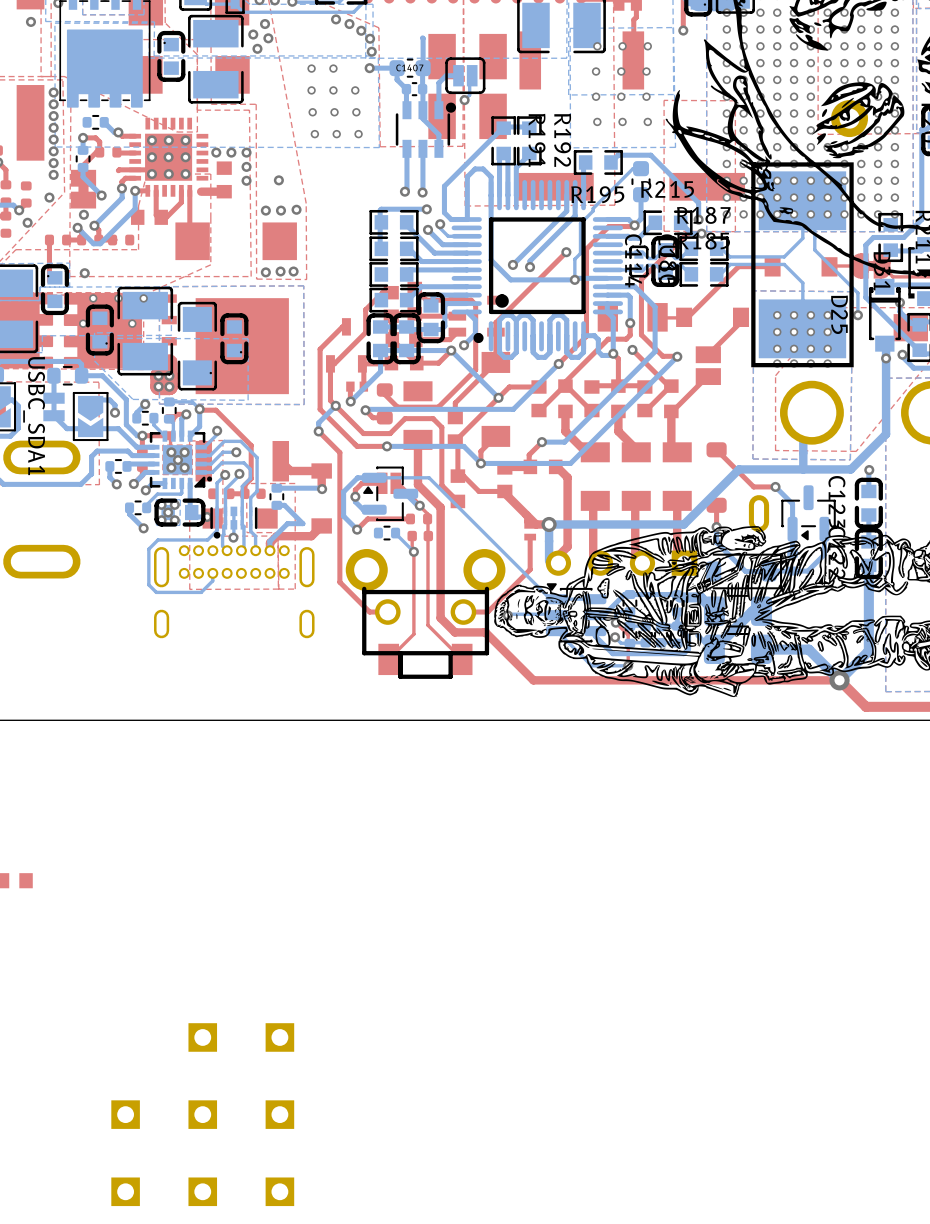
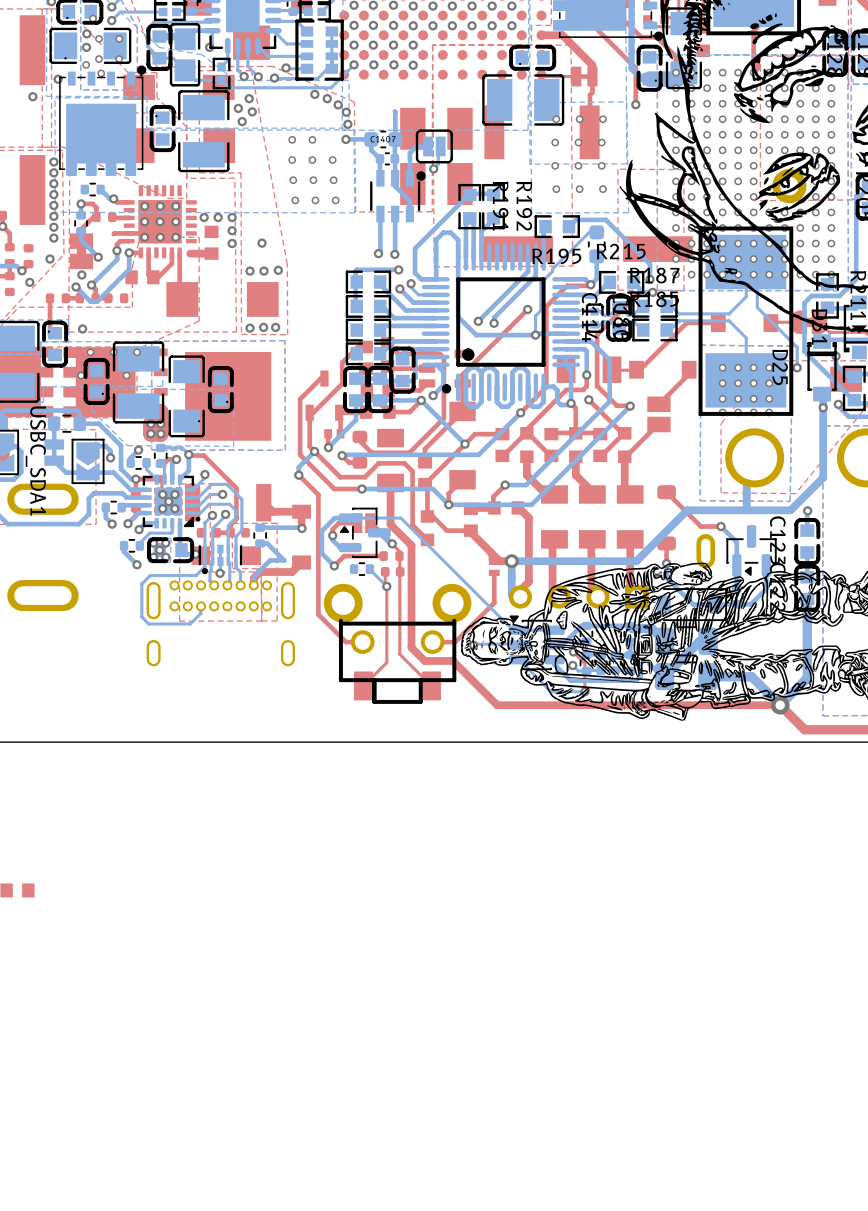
part: (202, 1037) -> none
part: (279, 1037) -> none
part: (125, 1114) -> none
part: (202, 1114) -> none
part: (279, 1114) -> none
part: (125, 1191) -> none
part: (202, 1191) -> none
part: (279, 1191) -> none

